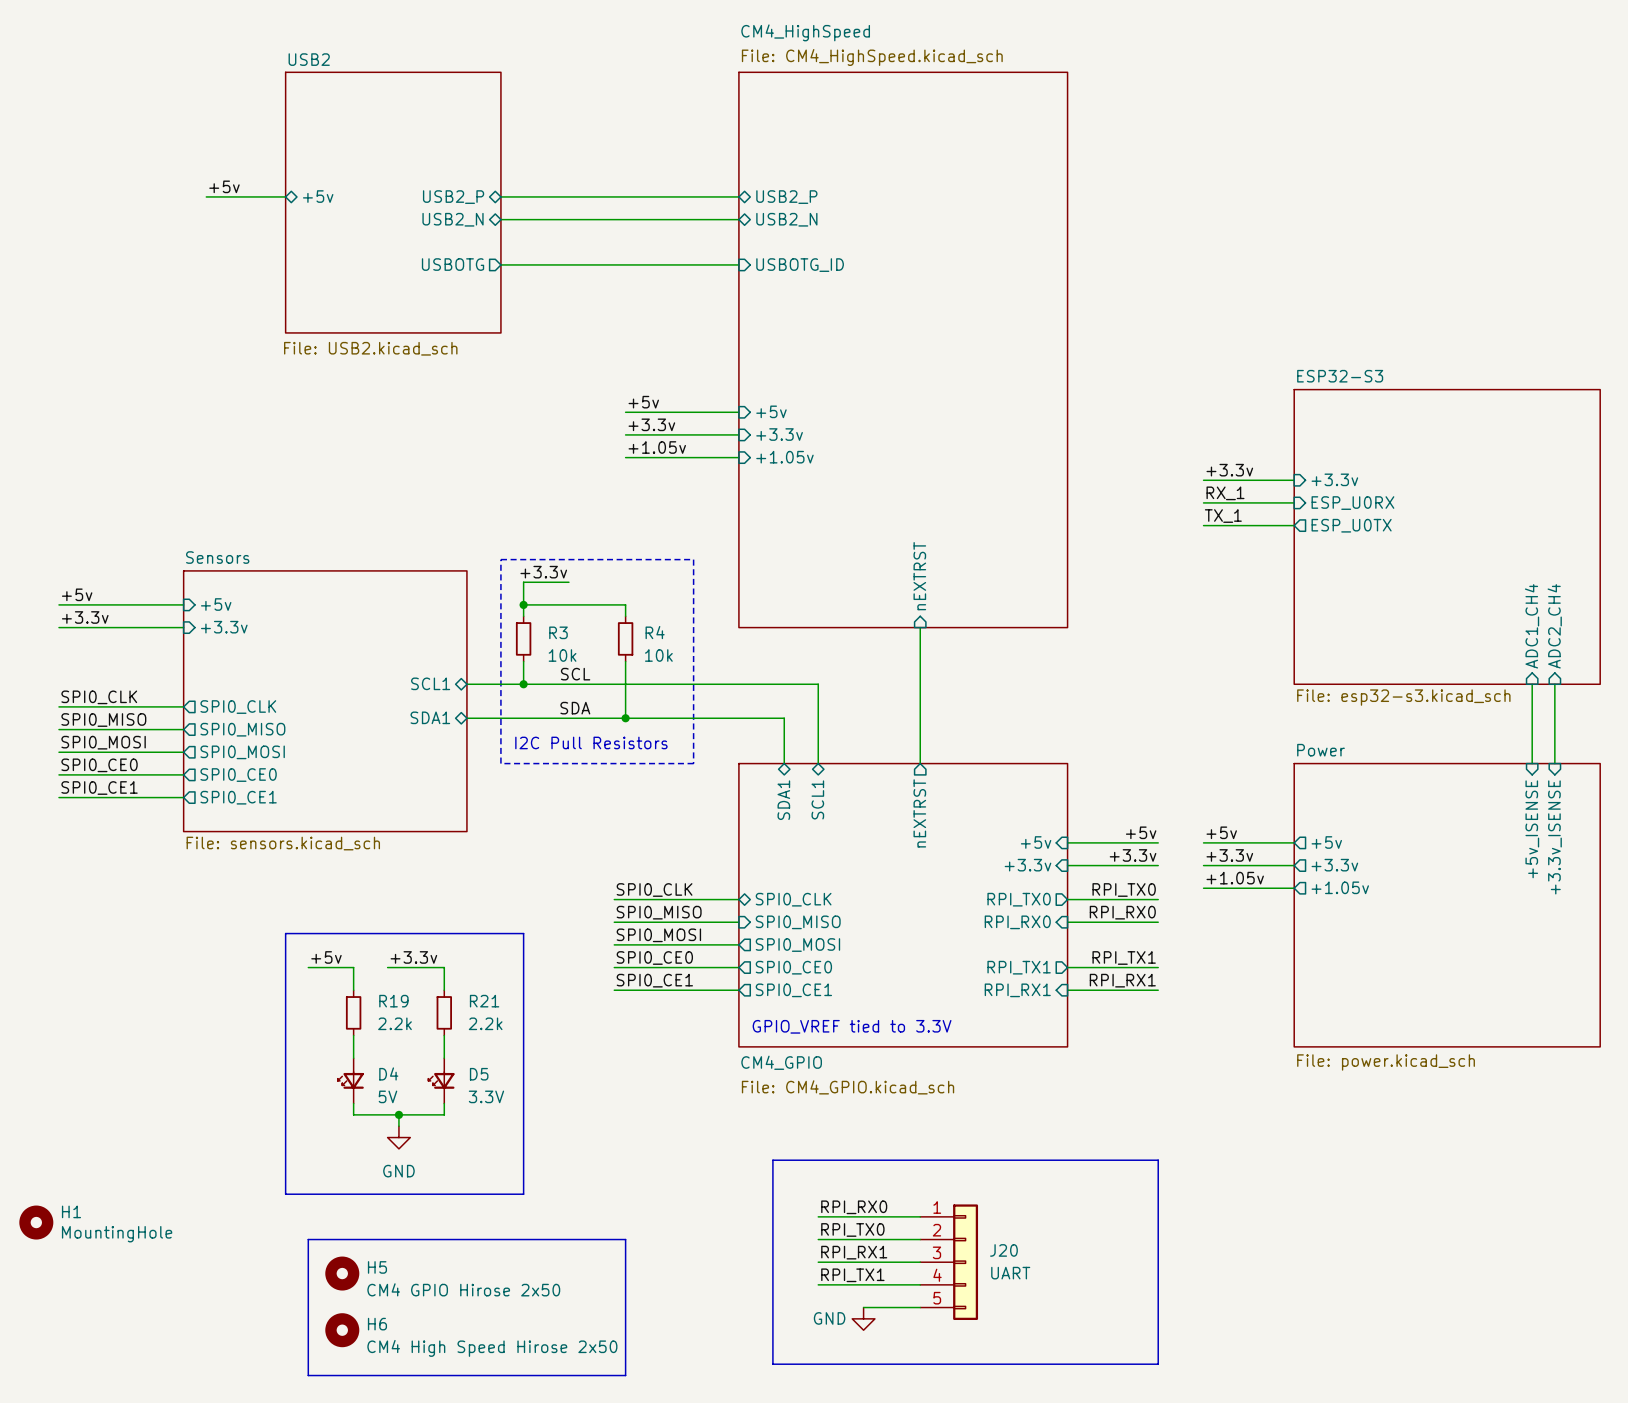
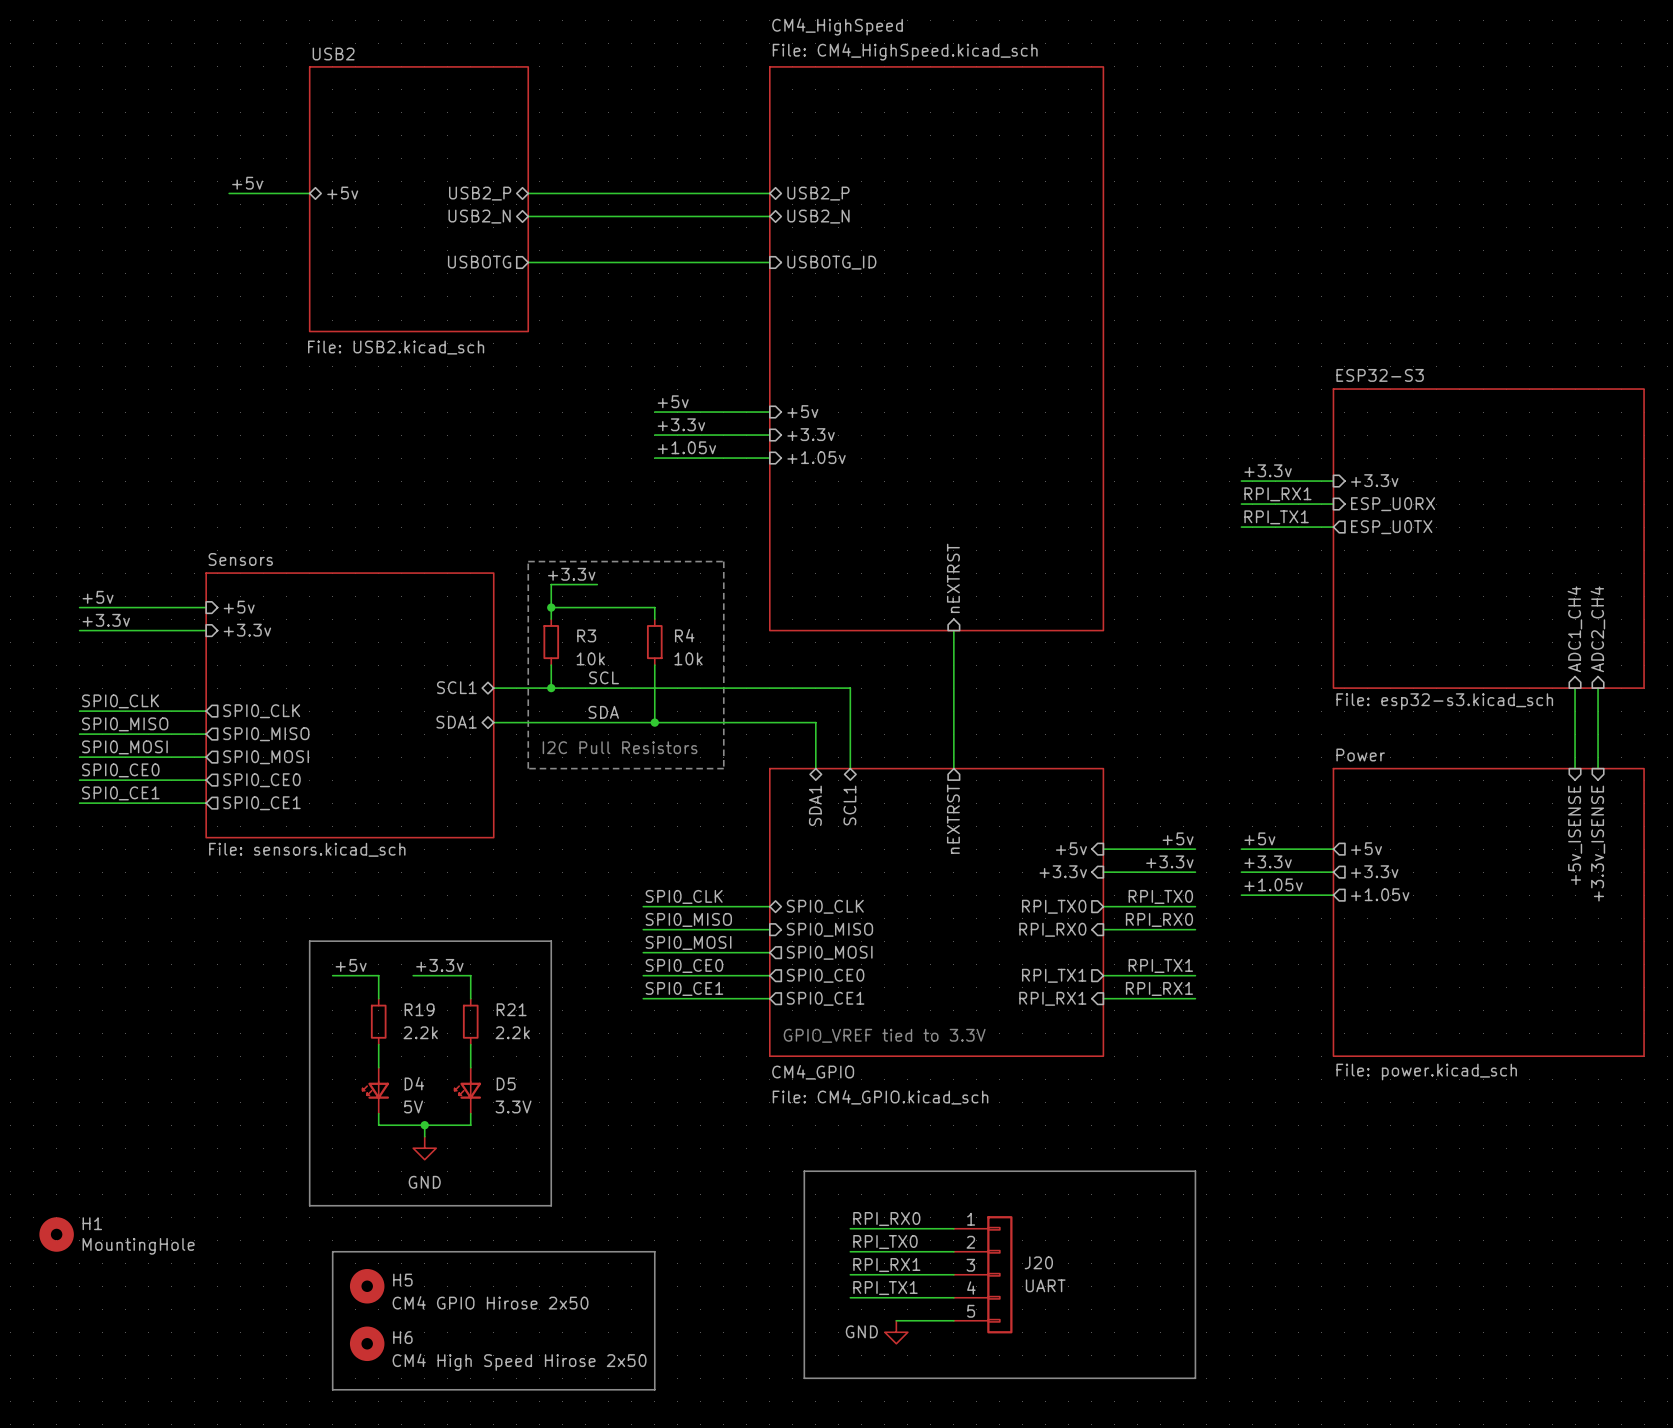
label: RX_1 (1225, 493) -> RPI_RX1 (1277, 494)
label: TX_1 (1223, 516) -> RPI_TX1 (1276, 517)

